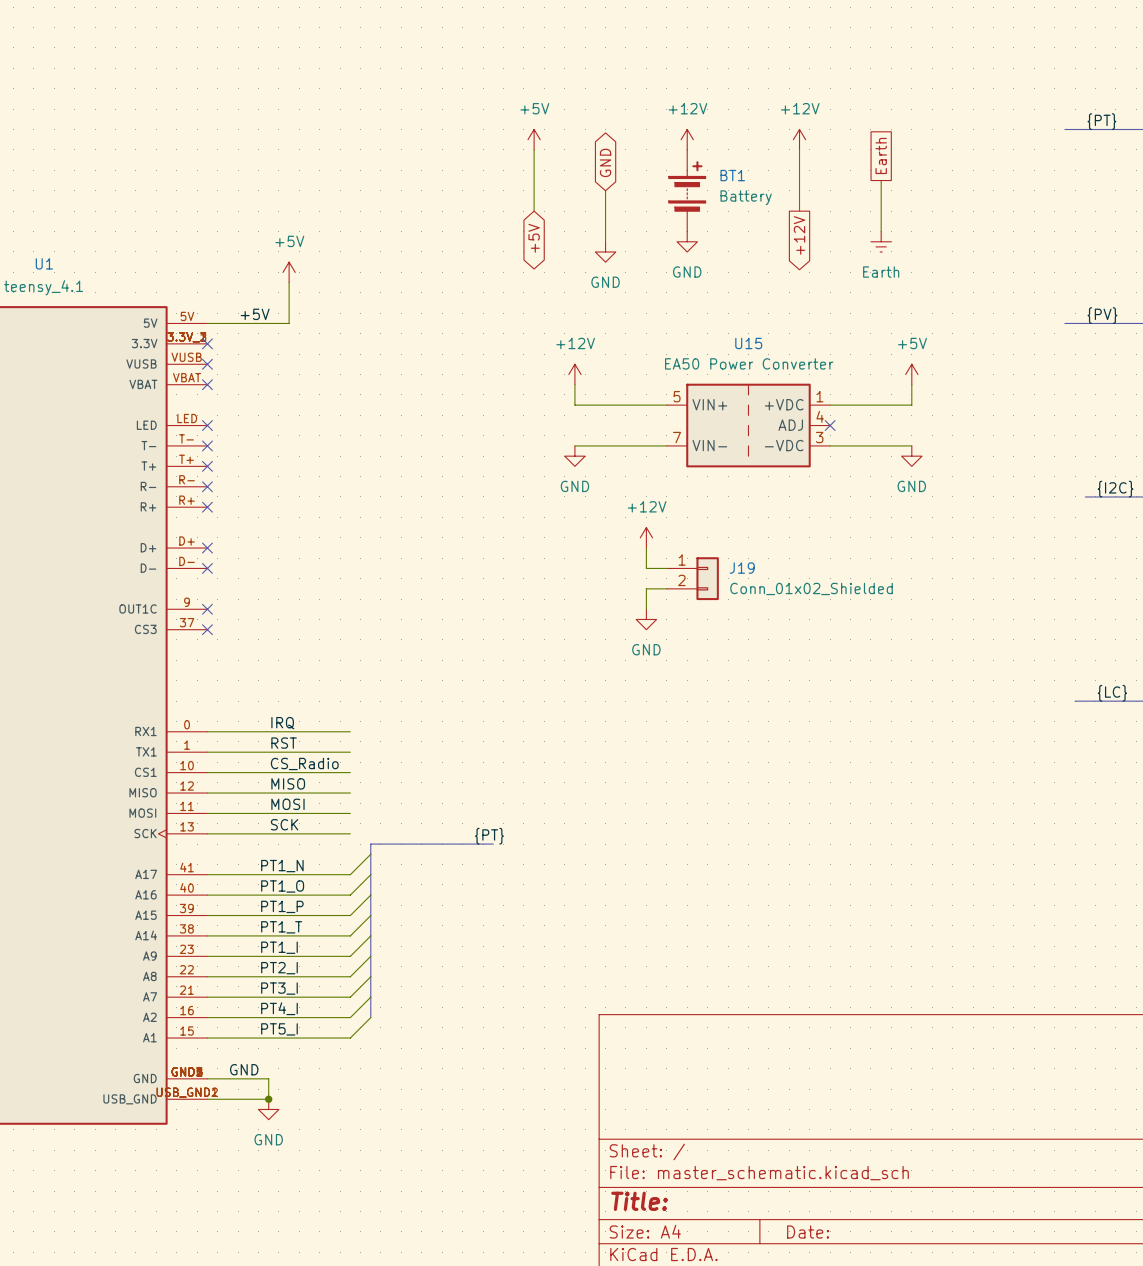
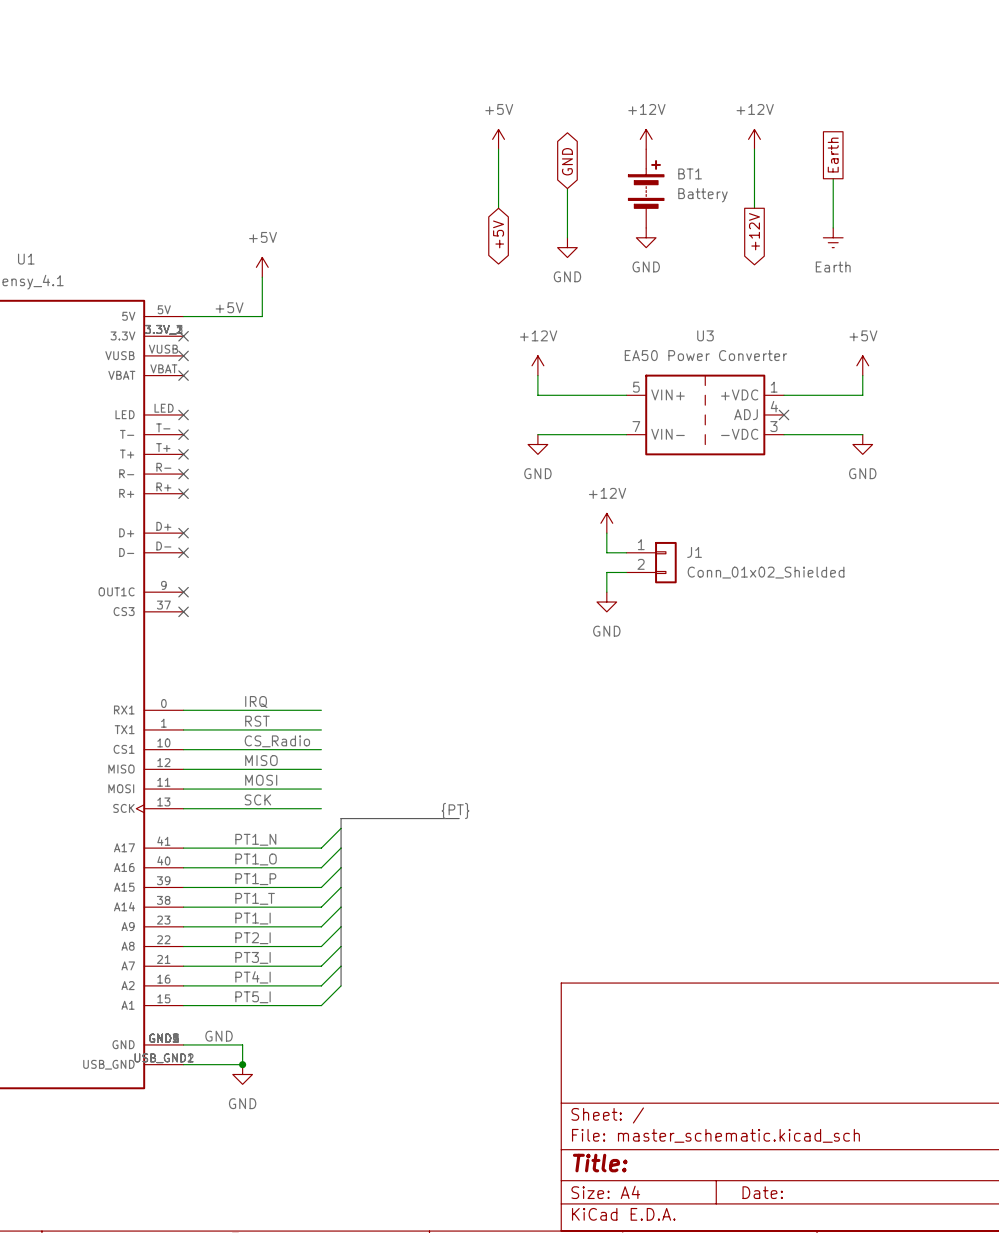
U15 name: U15 (748, 343) -> U3 (705, 335)
J19 name: J19 (742, 568) -> J1 (694, 552)

